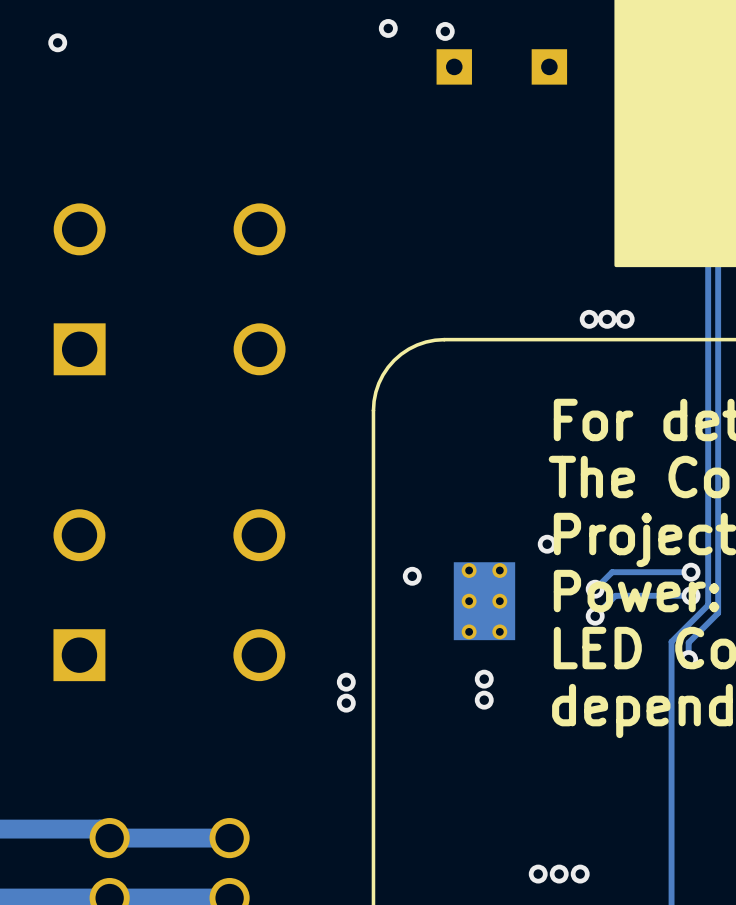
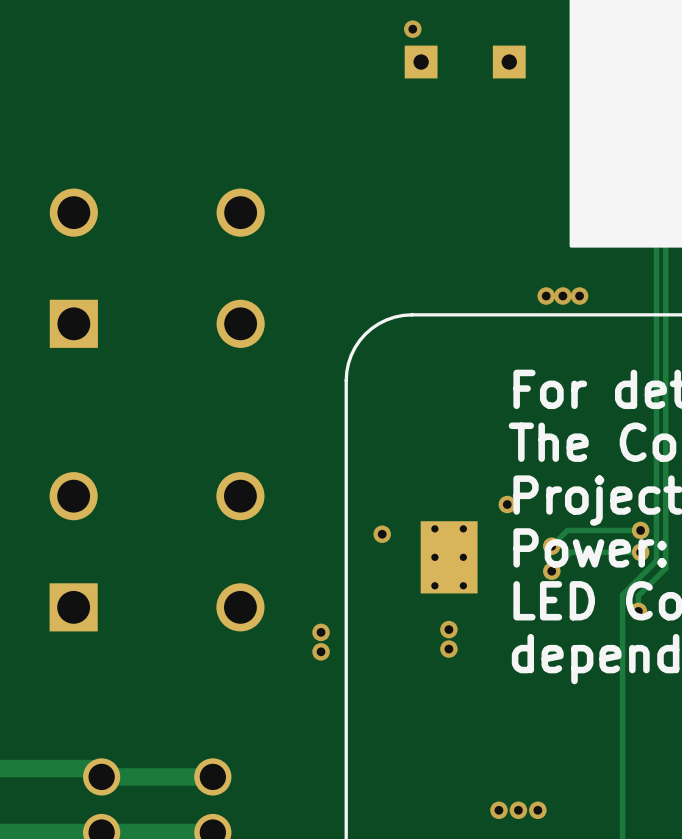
via: (388, 28) -> none
via: (57, 42) -> none

